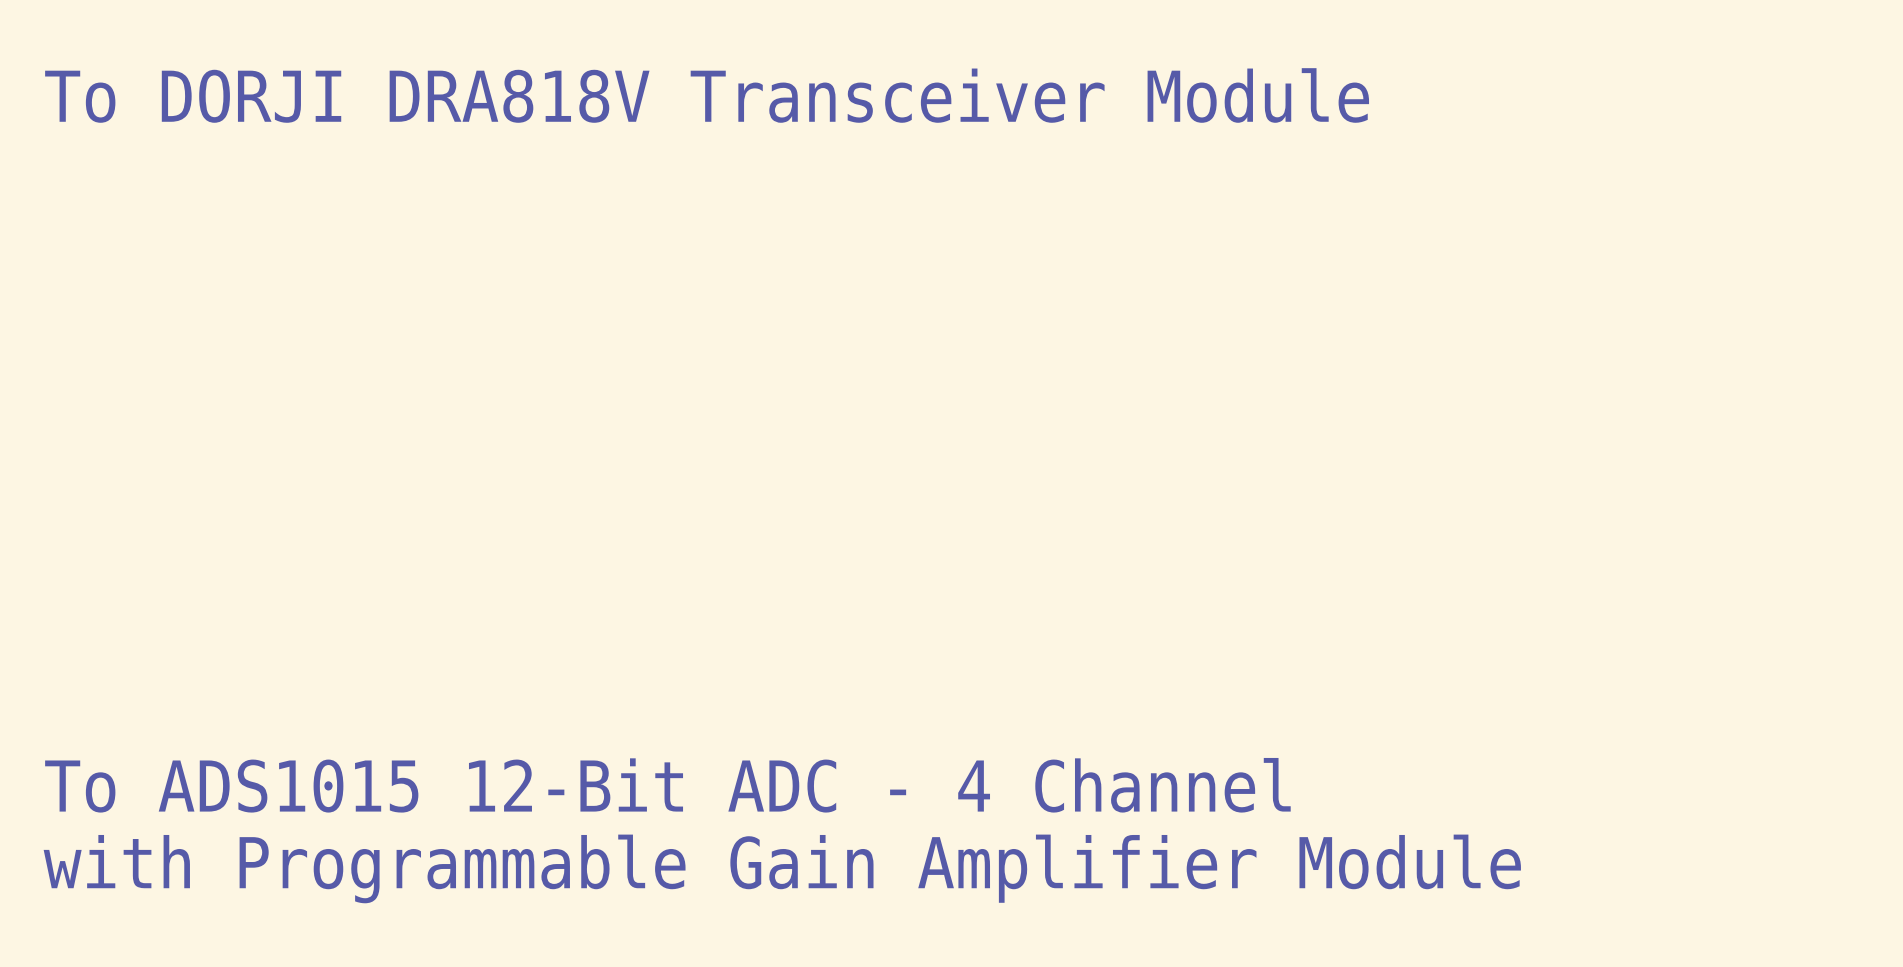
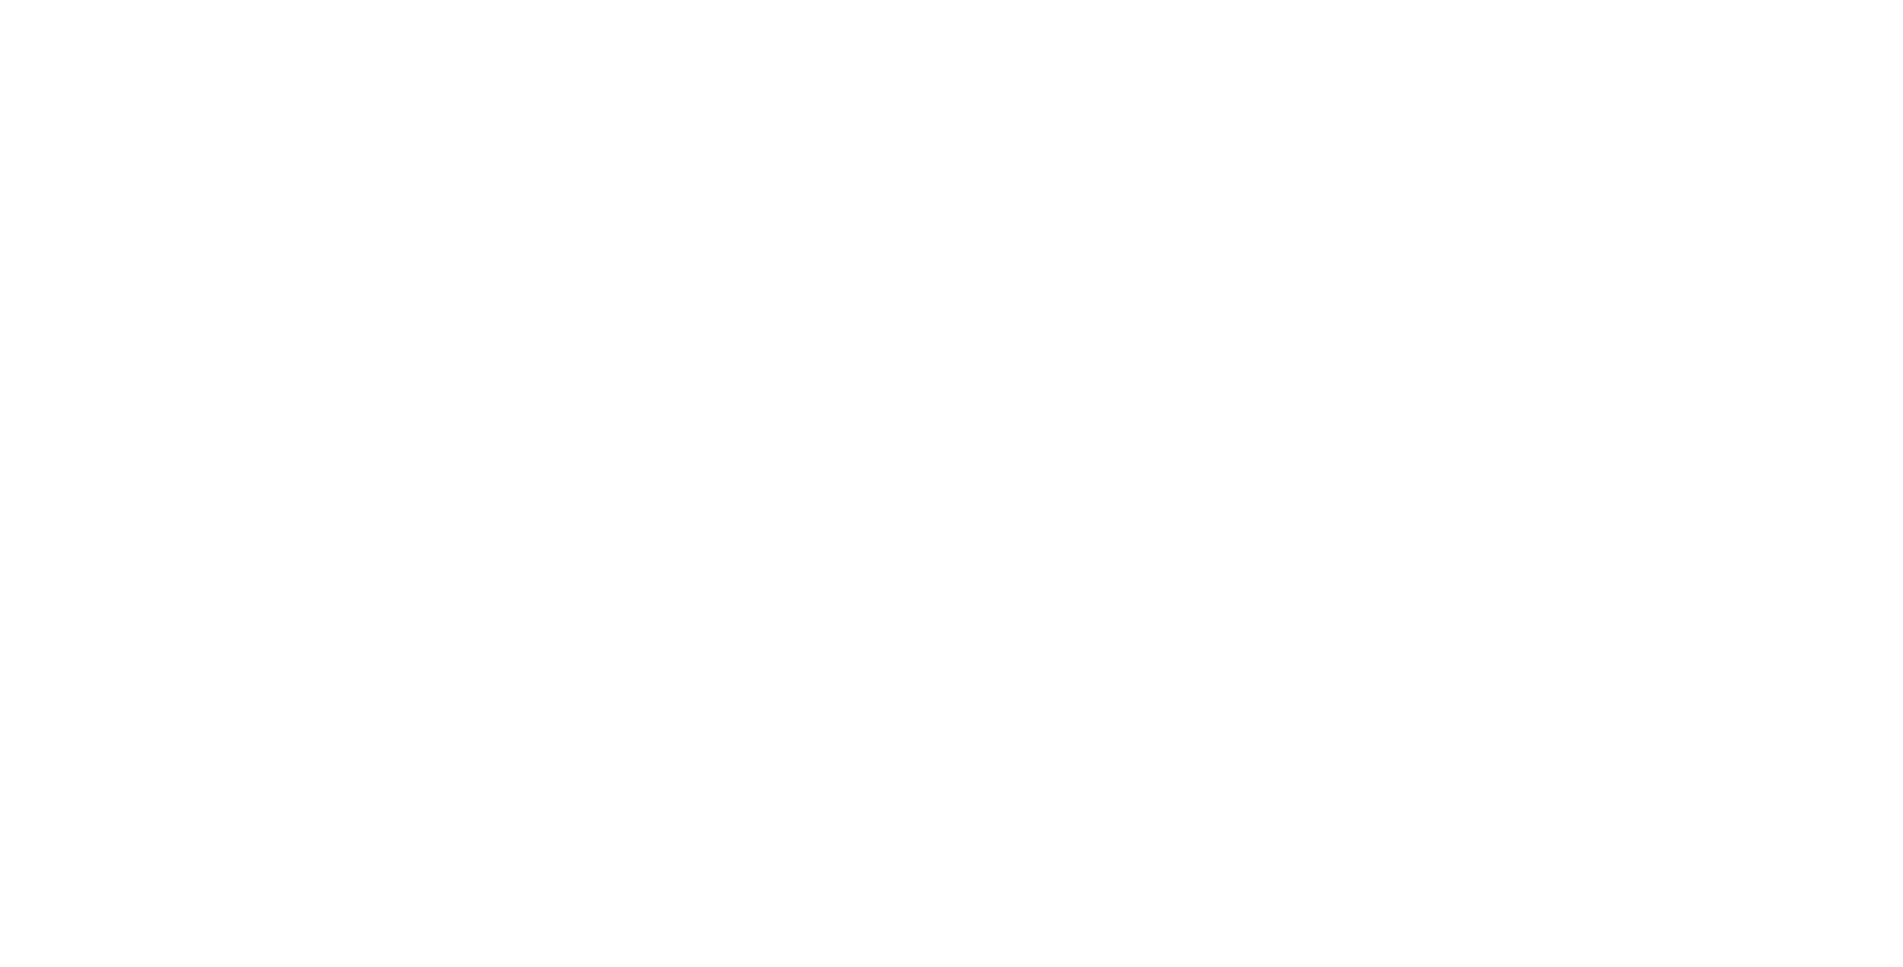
text: To DORJI DRA818V Transceiver Module (707, 95) -> none
text: To ADS1015 12-Bit ADC - 4 Channel (667, 785) -> none
text: with Programmable Gain Amplifier Module (782, 868) -> none

